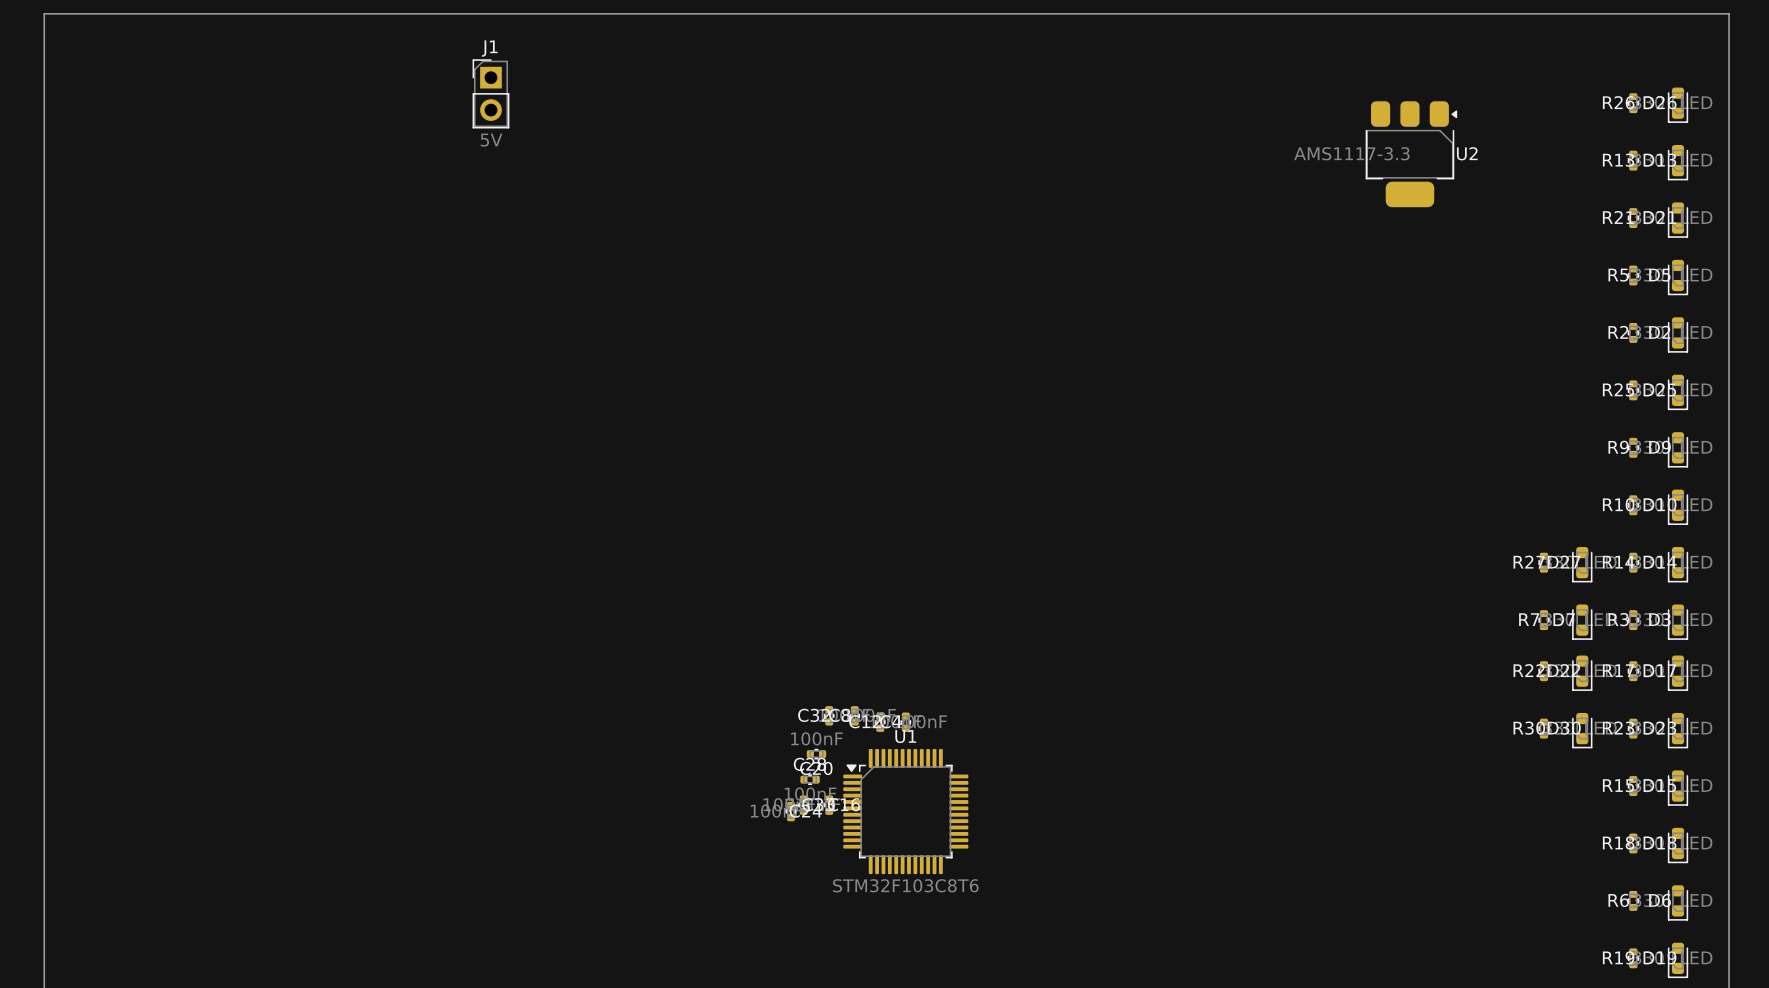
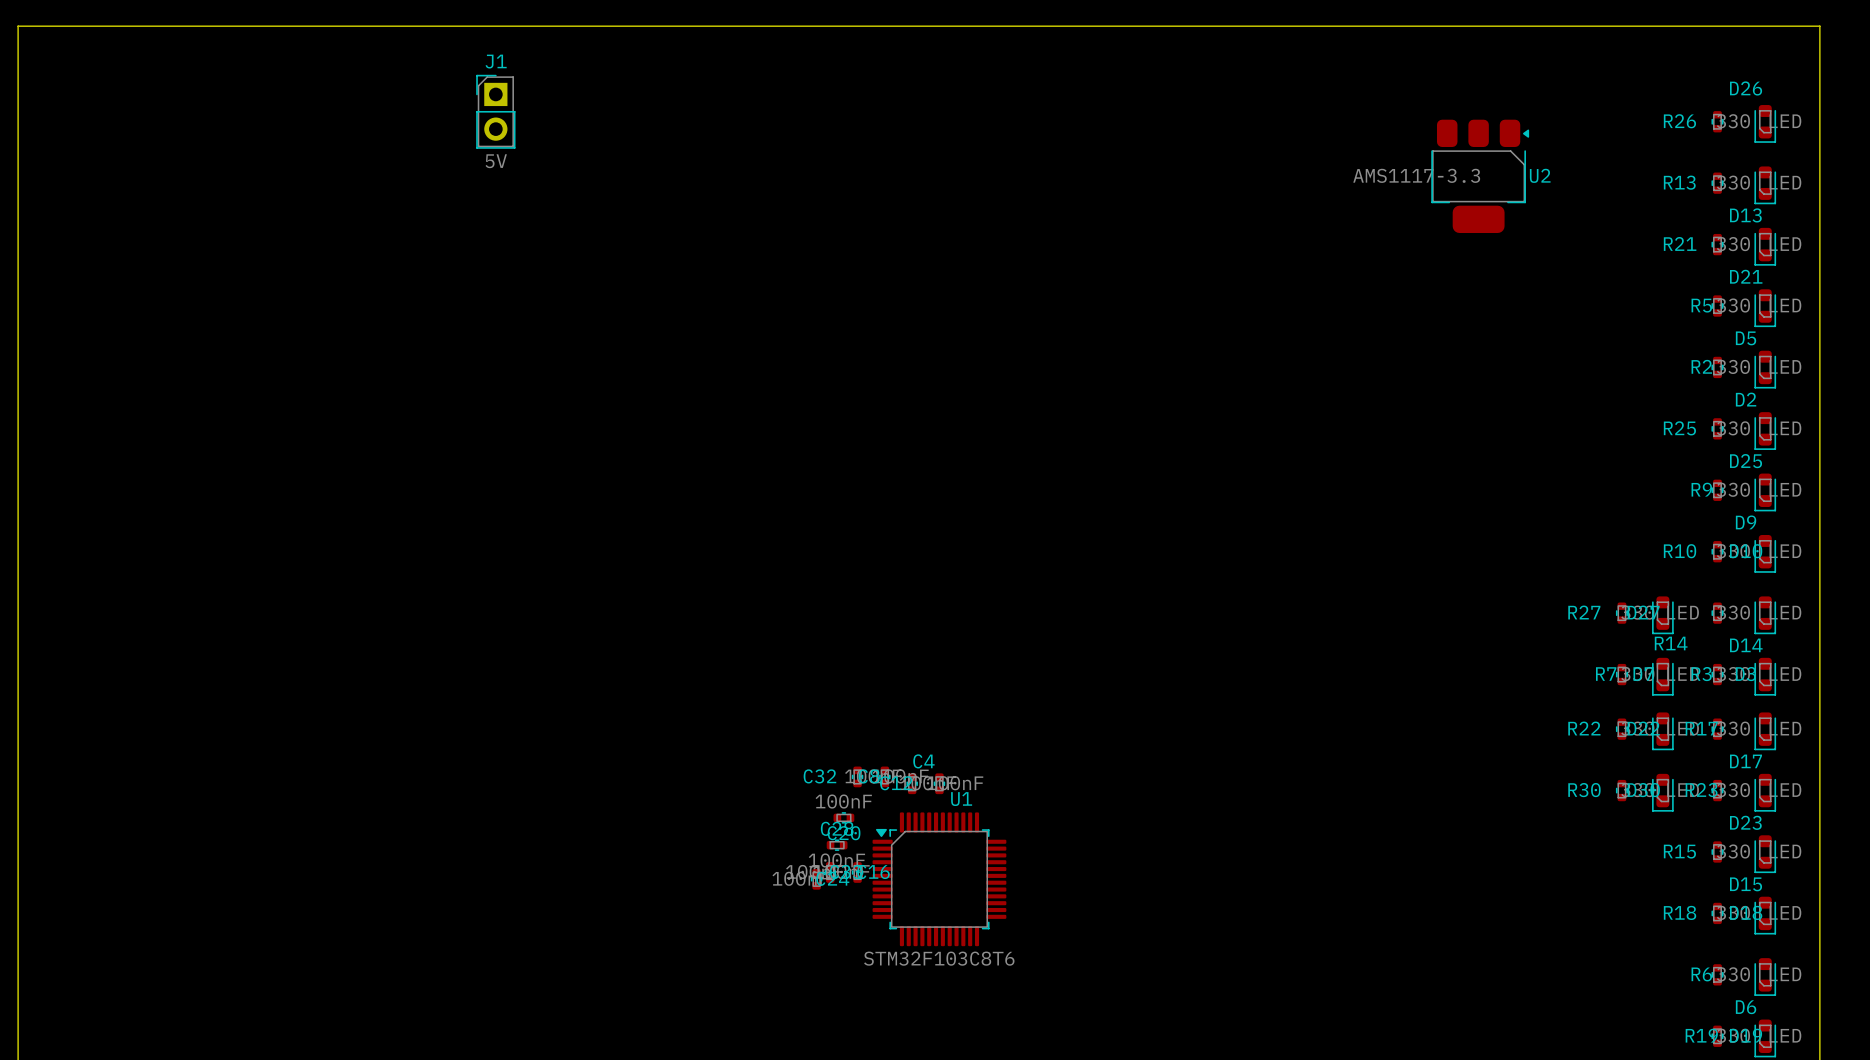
R26 name position: R26 (1618, 102) -> R26 (1679, 121)
D26 name position: D26 (1660, 102) -> D26 (1746, 88)
R13 name position: R13 (1618, 160) -> R13 (1679, 182)
D13 name position: D13 (1659, 160) -> D13 (1745, 215)
R21 name position: R21 (1618, 217) -> R21 (1680, 243)
D21 name position: D21 (1659, 217) -> D21 (1746, 276)
D5 name position: D5 (1659, 275) -> D5 (1746, 338)
D2 name position: D2 (1659, 332) -> D2 (1746, 399)
R25 name position: R25 (1618, 389) -> R25 (1679, 428)
D25 name position: D25 (1659, 389) -> D25 (1746, 461)
D9 name position: D9 (1659, 447) -> D9 (1746, 522)
R10 name position: R10 (1618, 504) -> R10 (1680, 551)
R27 name position: R27 (1529, 562) -> R27 (1584, 612)
R14 name position: R14 (1618, 562) -> R14 (1671, 643)
D14 name position: D14 (1660, 562) -> D14 (1746, 645)
R22 name position: R22 (1529, 670) -> R22 (1584, 728)
D17 name position: D17 (1659, 670) -> D17 (1746, 761)
C32 name position: C32 (814, 715) -> C32 (819, 776)
C4 name position: C4 (890, 721) -> C4 (923, 761)
R30 name position: R30 (1529, 728) -> R30 (1584, 790)
D23 name position: D23 (1659, 728) -> D23 (1745, 822)
U1 name position: U1 (905, 736) -> U1 (961, 799)
R15 name position: R15 (1618, 785) -> R15 (1679, 851)
D15 name position: D15 (1659, 785) -> D15 (1746, 884)
R18 name position: R18 (1618, 843) -> R18 (1680, 912)
D6 name position: D6 (1660, 900) -> D6 (1746, 1007)

